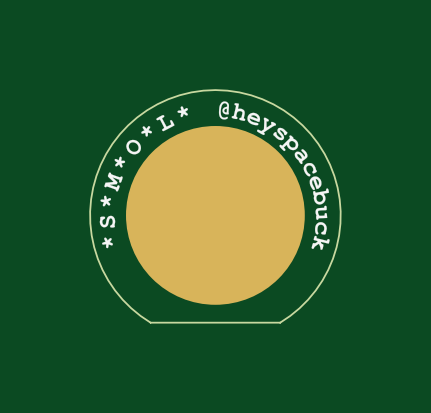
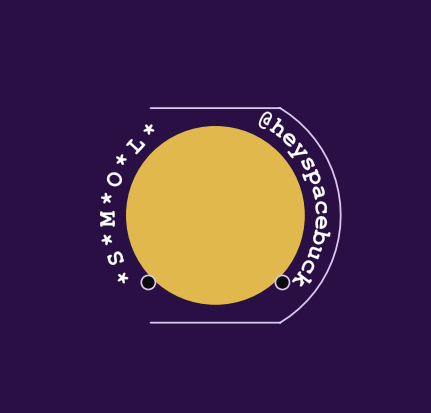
drawing: [218, 101, 330, 250] -> none
drawing: [99, 106, 188, 249] -> none
board edge: none -> (280, 108) (150, 108)
drawing: none -> [258, 111, 331, 287]
drawing: none -> [100, 124, 155, 284]
part: none -> (148, 282)
part: none -> (282, 282)
board edge: (150, 322) (122, 299) (108, 280) (97, 258) (90, 223) (93, 187) (106, 153) (119, 134) (137, 117) (157, 104) (179, 95) (215, 90) (251, 95) (273, 104) (293, 117) (318, 143) (334, 176) (340, 211) (339, 235) (332, 258) (315, 290) (299, 308) (280, 322) -> (280, 108) (299, 122) (321, 148) (335, 180) (340, 215) (335, 250) (321, 282) (299, 308) (280, 322)

